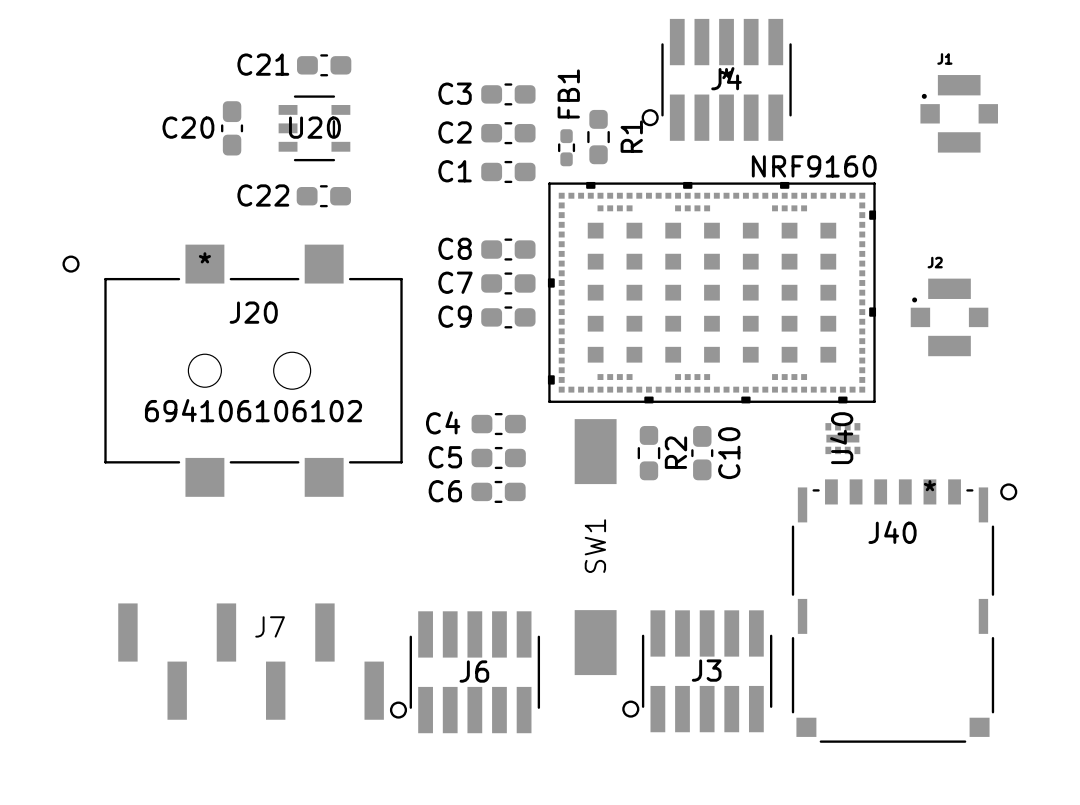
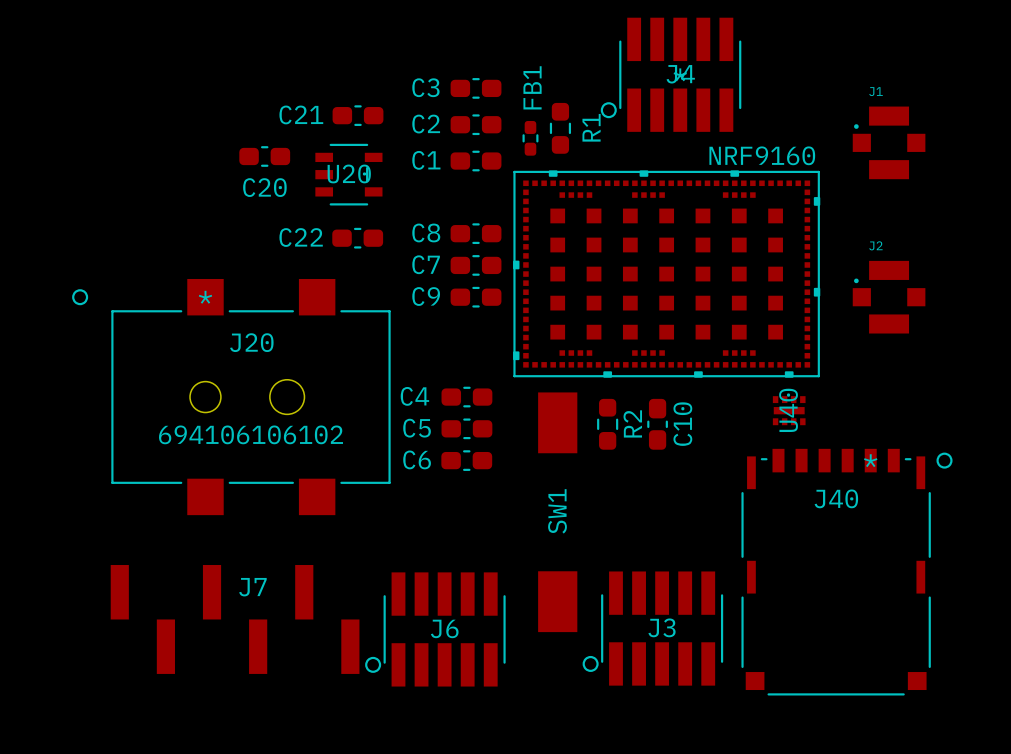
C21 position: (324, 65) -> (358, 115)
J1 position: (959, 113) -> (889, 142)
C20 name position: C20 (188, 127) -> C20 (264, 187)
C20 rotation: 0° (232, 128) -> 90° clockwise (264, 156)
C20 position: (232, 128) -> (264, 156)
U20 position: (314, 128) -> (348, 174)
C22 position: (323, 196) -> (357, 238)
J20 position: (232, 370) -> (231, 397)

